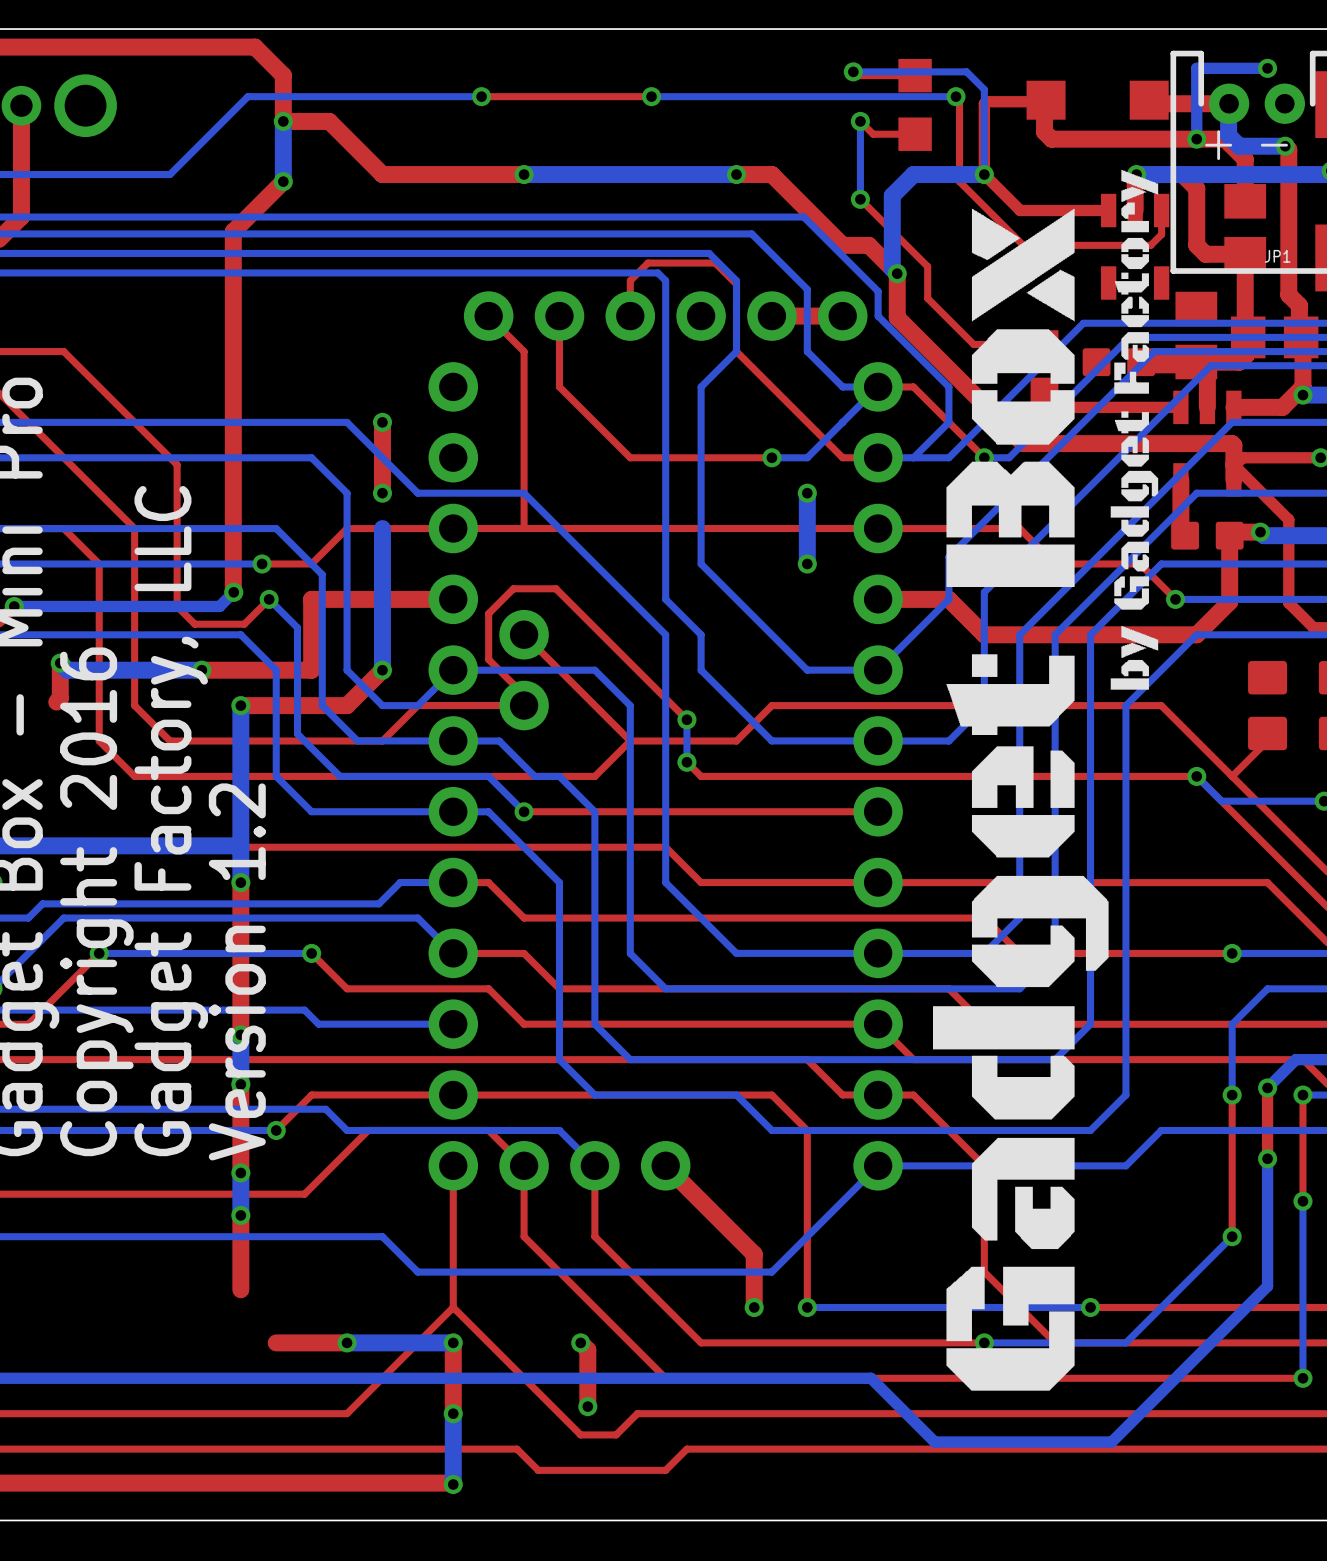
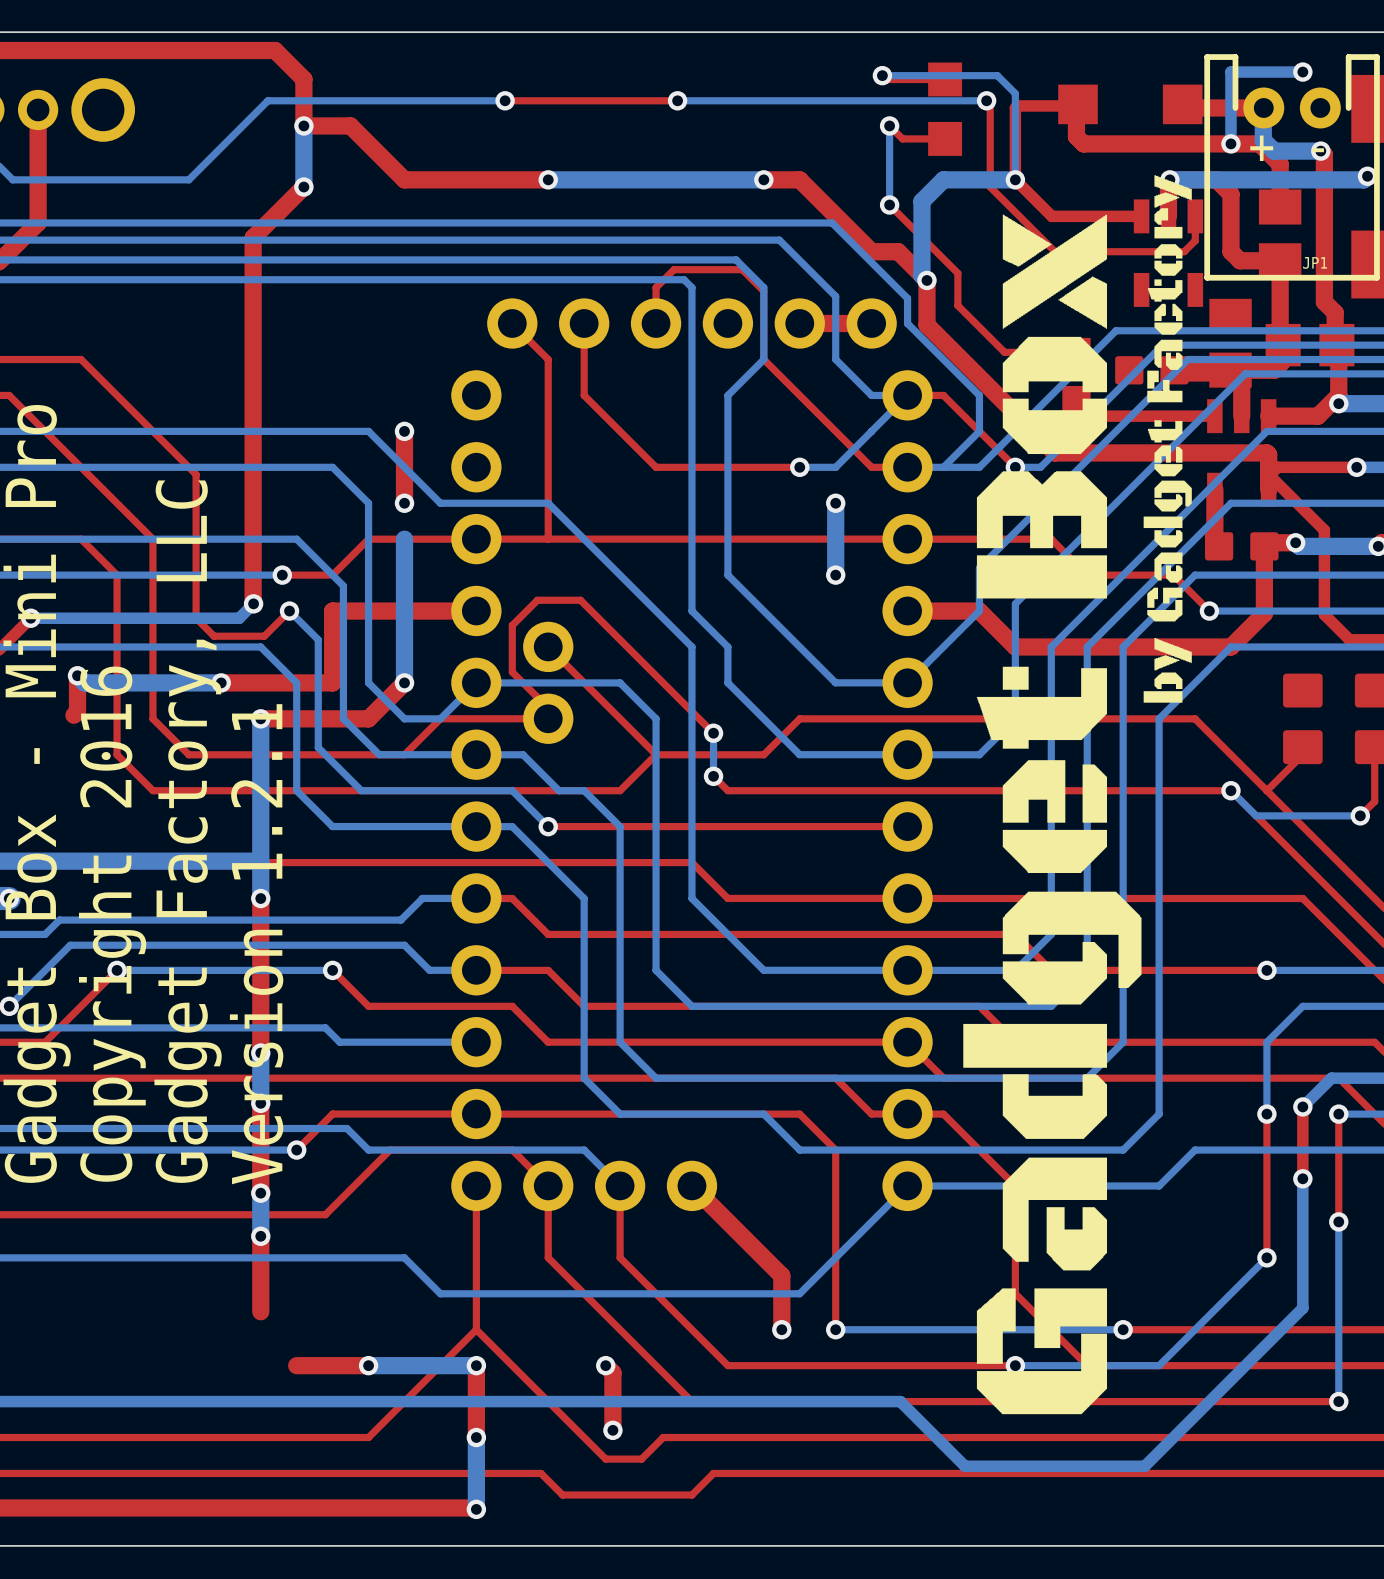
bottom track: (53, 928) (63, 918) (417, 918) (453, 953) -> (70, 945) (404, 945) (429, 970) (476, 970)
text: Version 1.2 (237, 971) -> Version 1.2.1 (256, 944)

